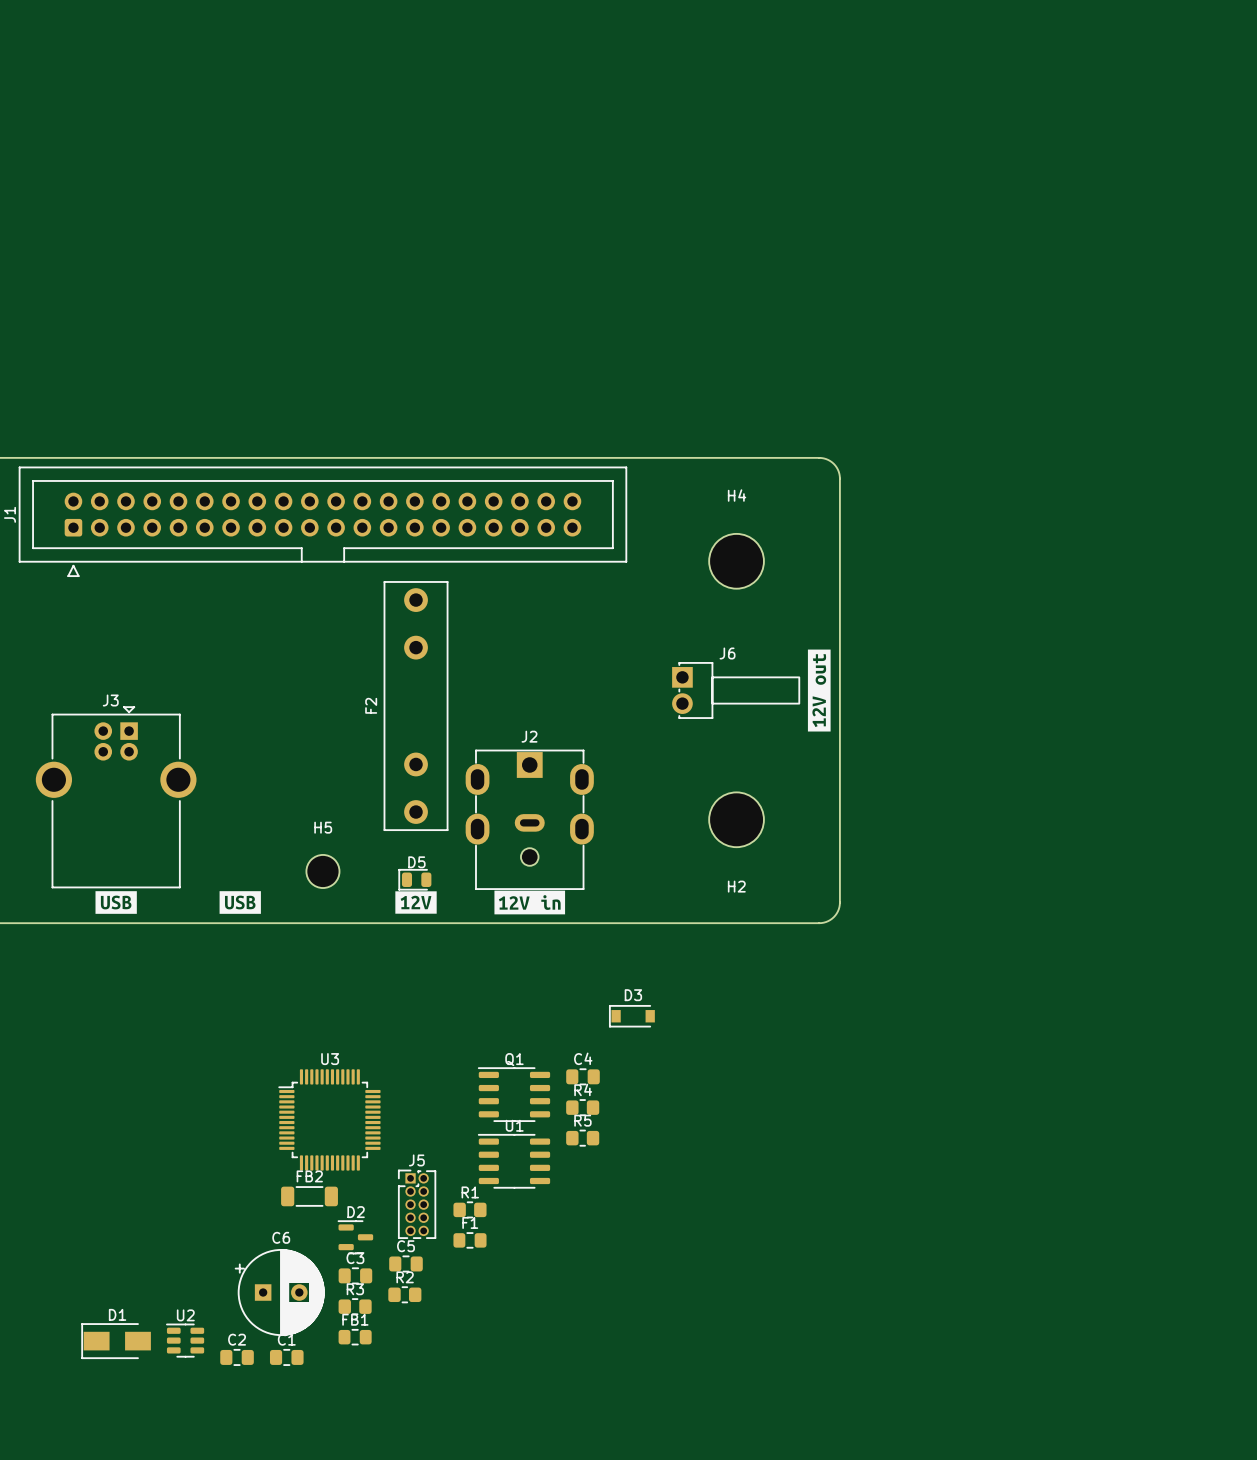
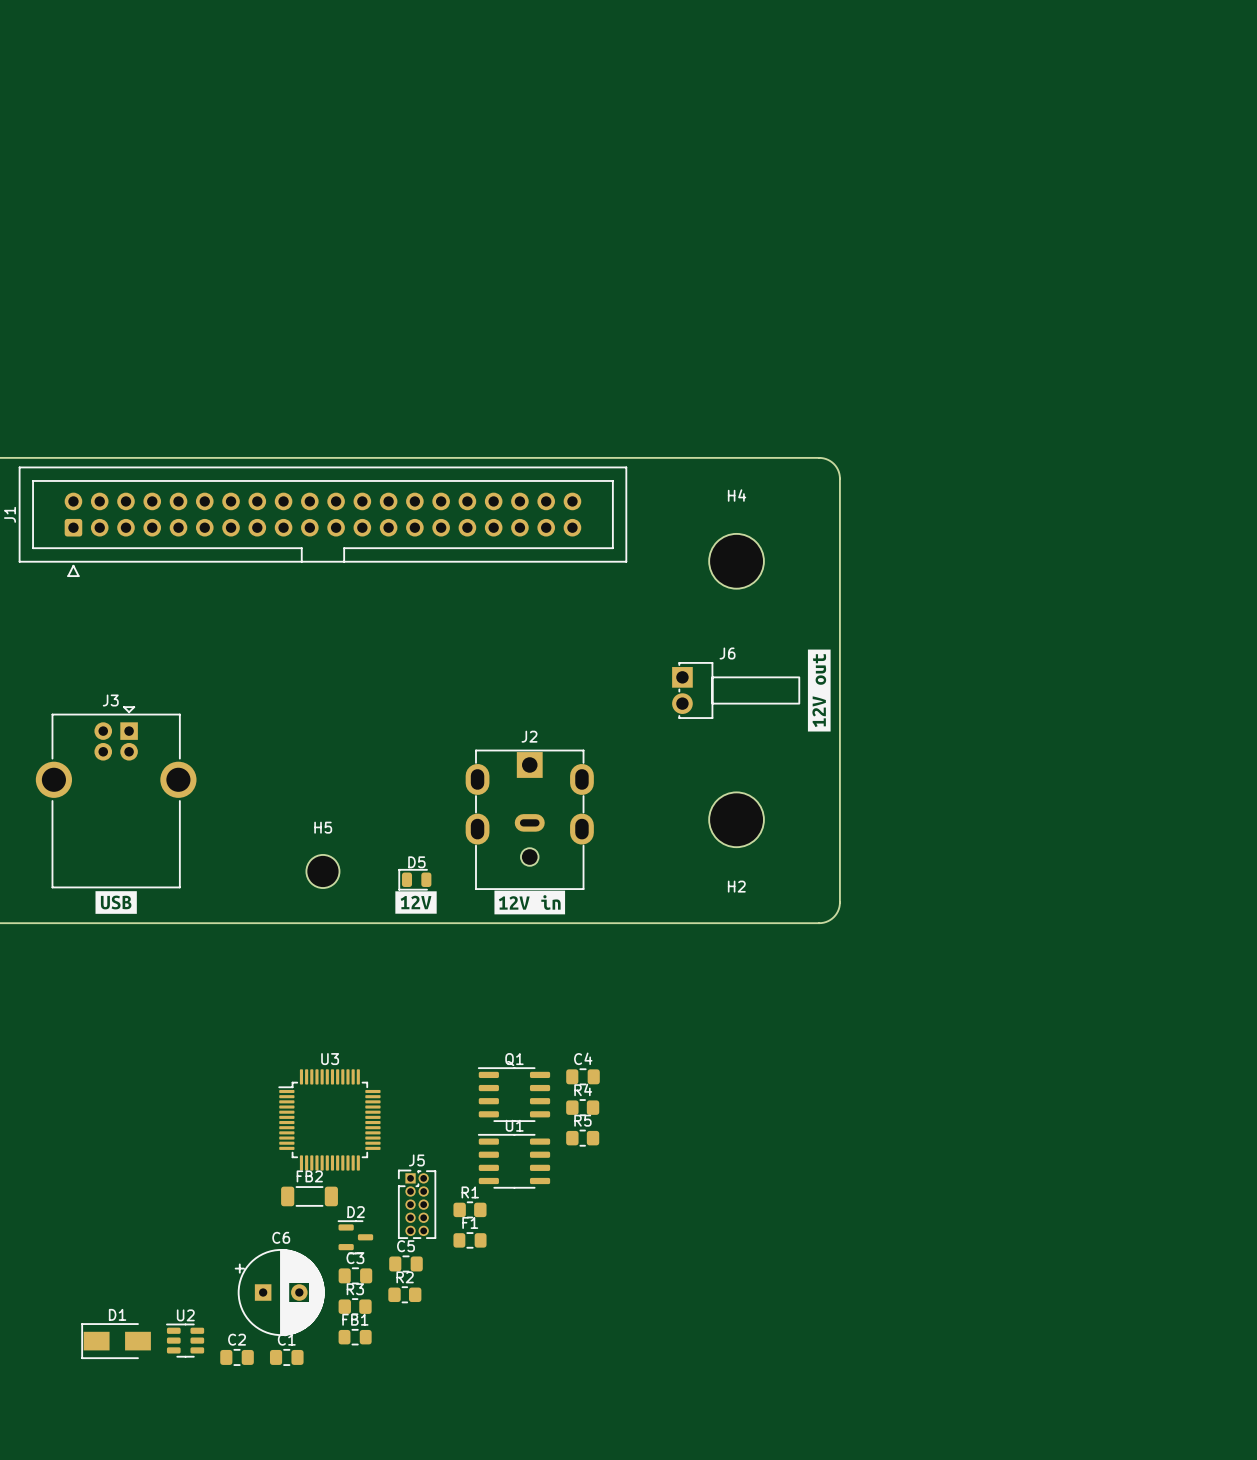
F2: (416, 706) -> none
drawing: [219, 891, 261, 914] -> none
D3: (632, 1016) -> none

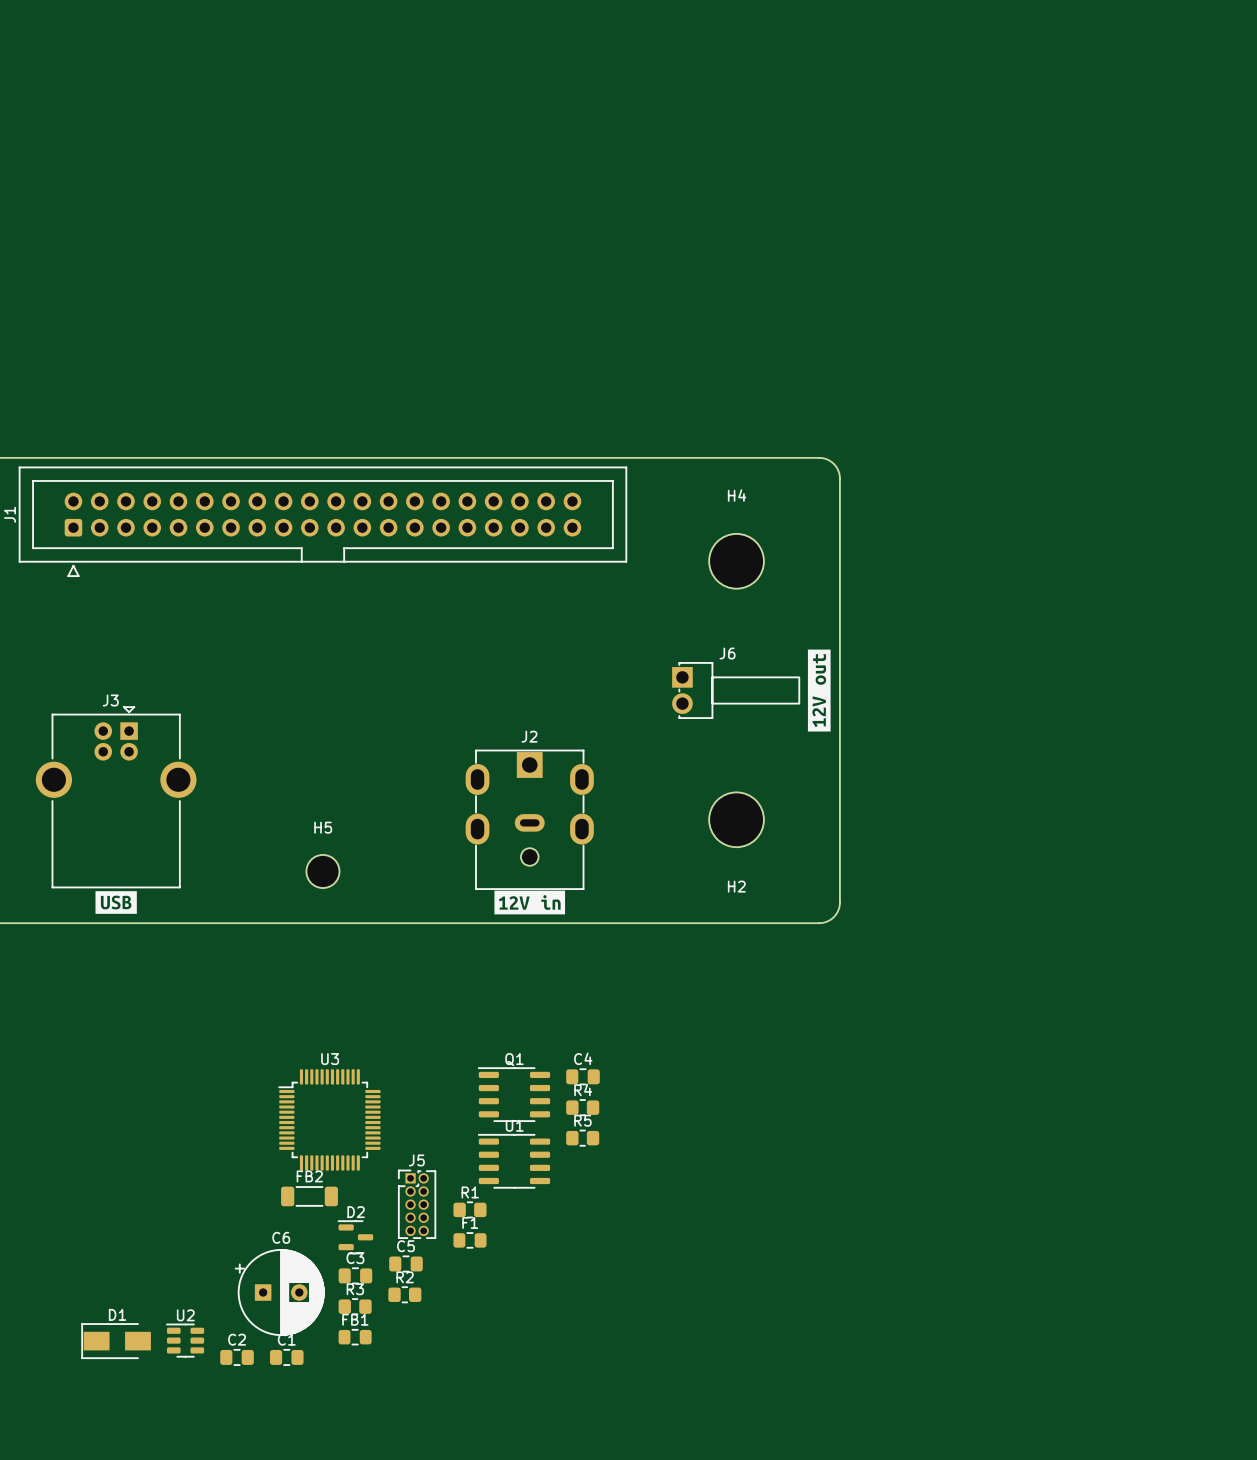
D5: (415, 879) -> none
drawing: [395, 891, 437, 914] -> none

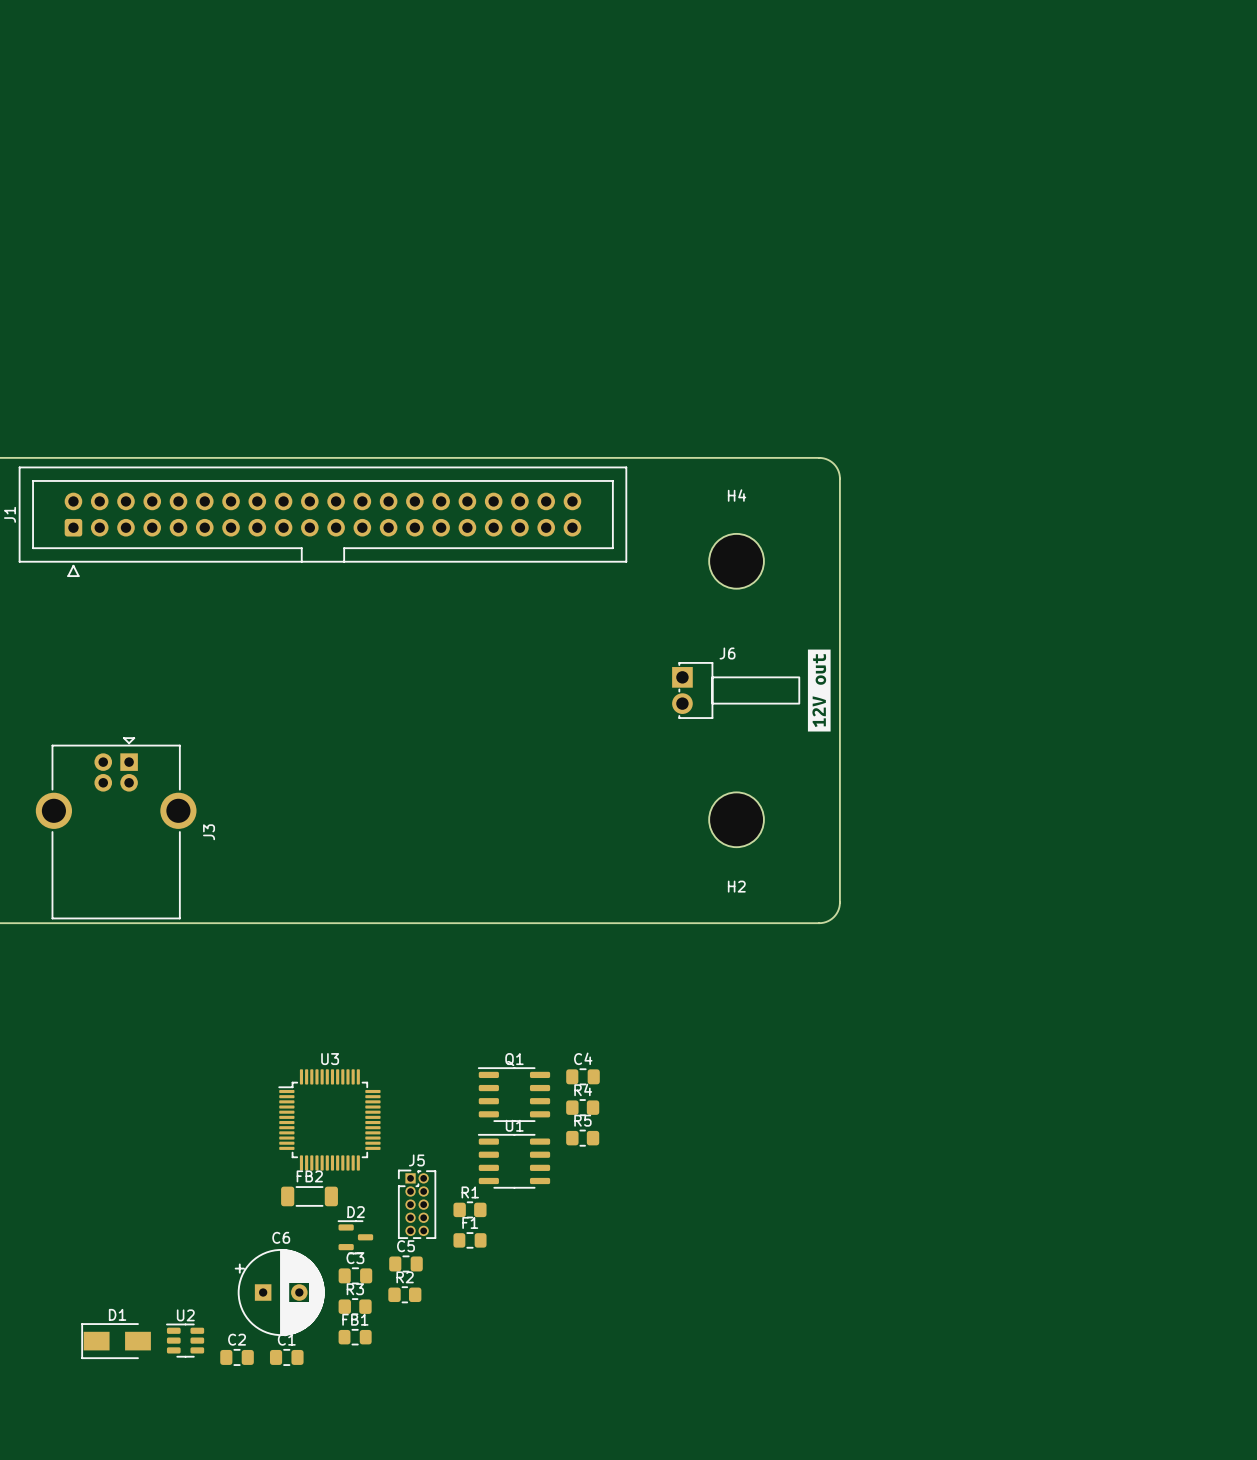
J3 name rotation: 0° (110, 700) -> 90° counterclockwise (209, 832)
J3 name position: J3 (110, 700) -> J3 (209, 832)
J3 position: (116, 797) -> (116, 828)
J2: (529, 819) -> none
H5: (322, 871) -> none
drawing: [494, 890, 566, 915] -> none
drawing: [95, 891, 137, 914] -> none

